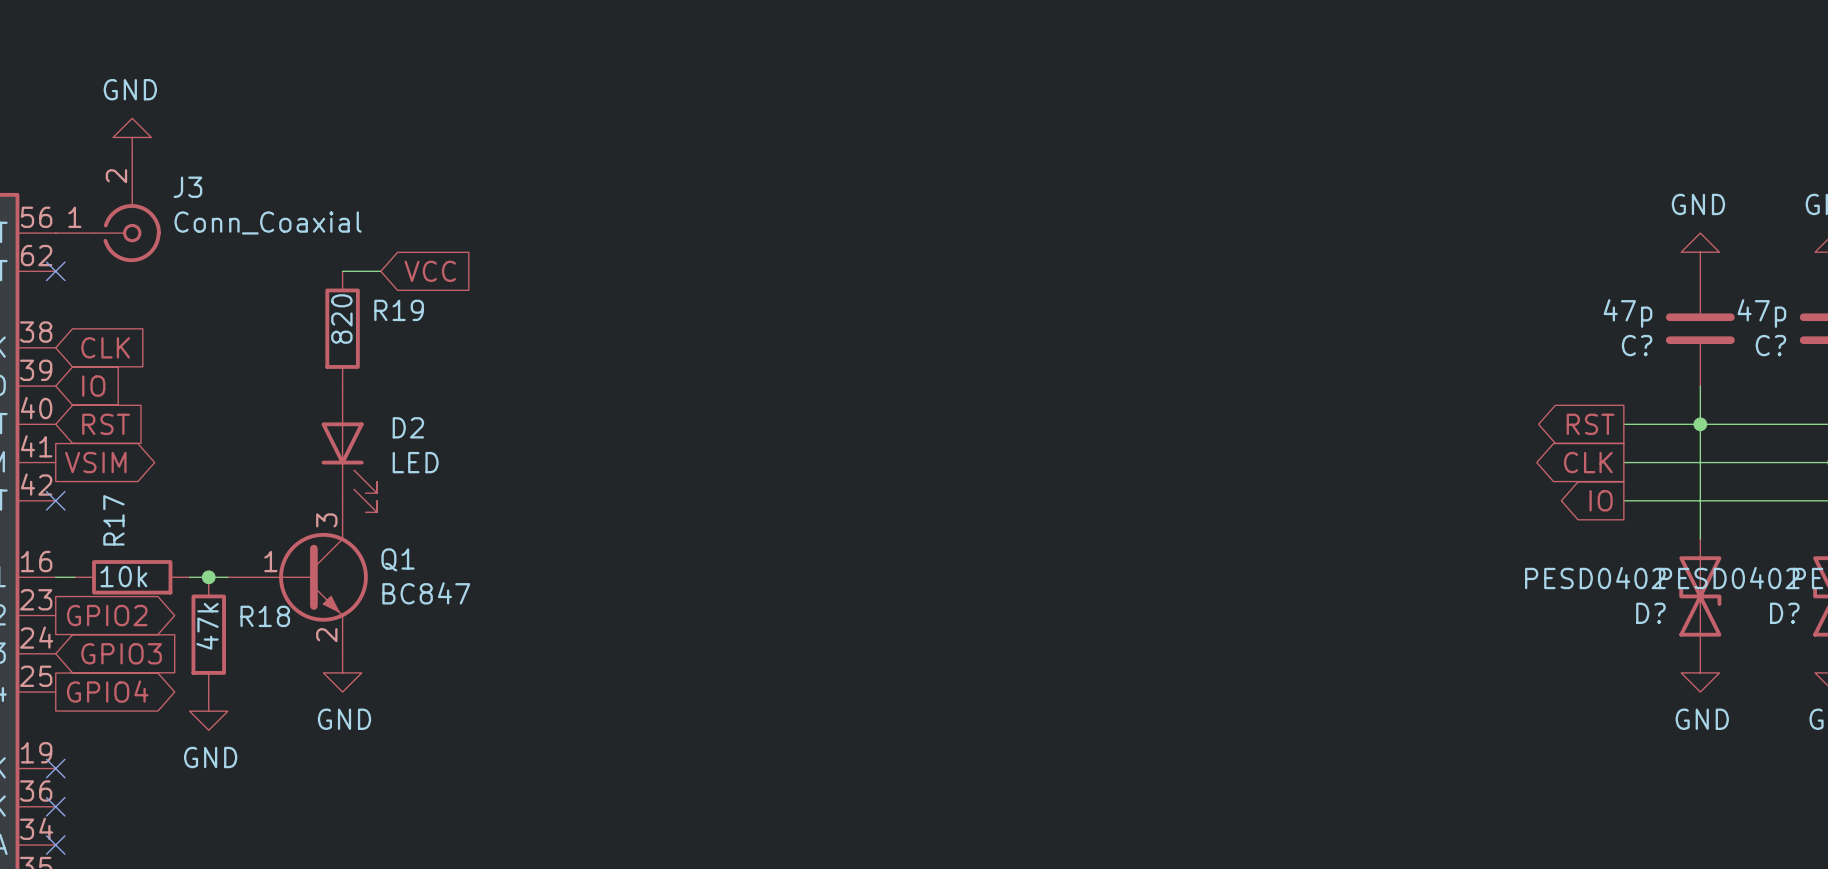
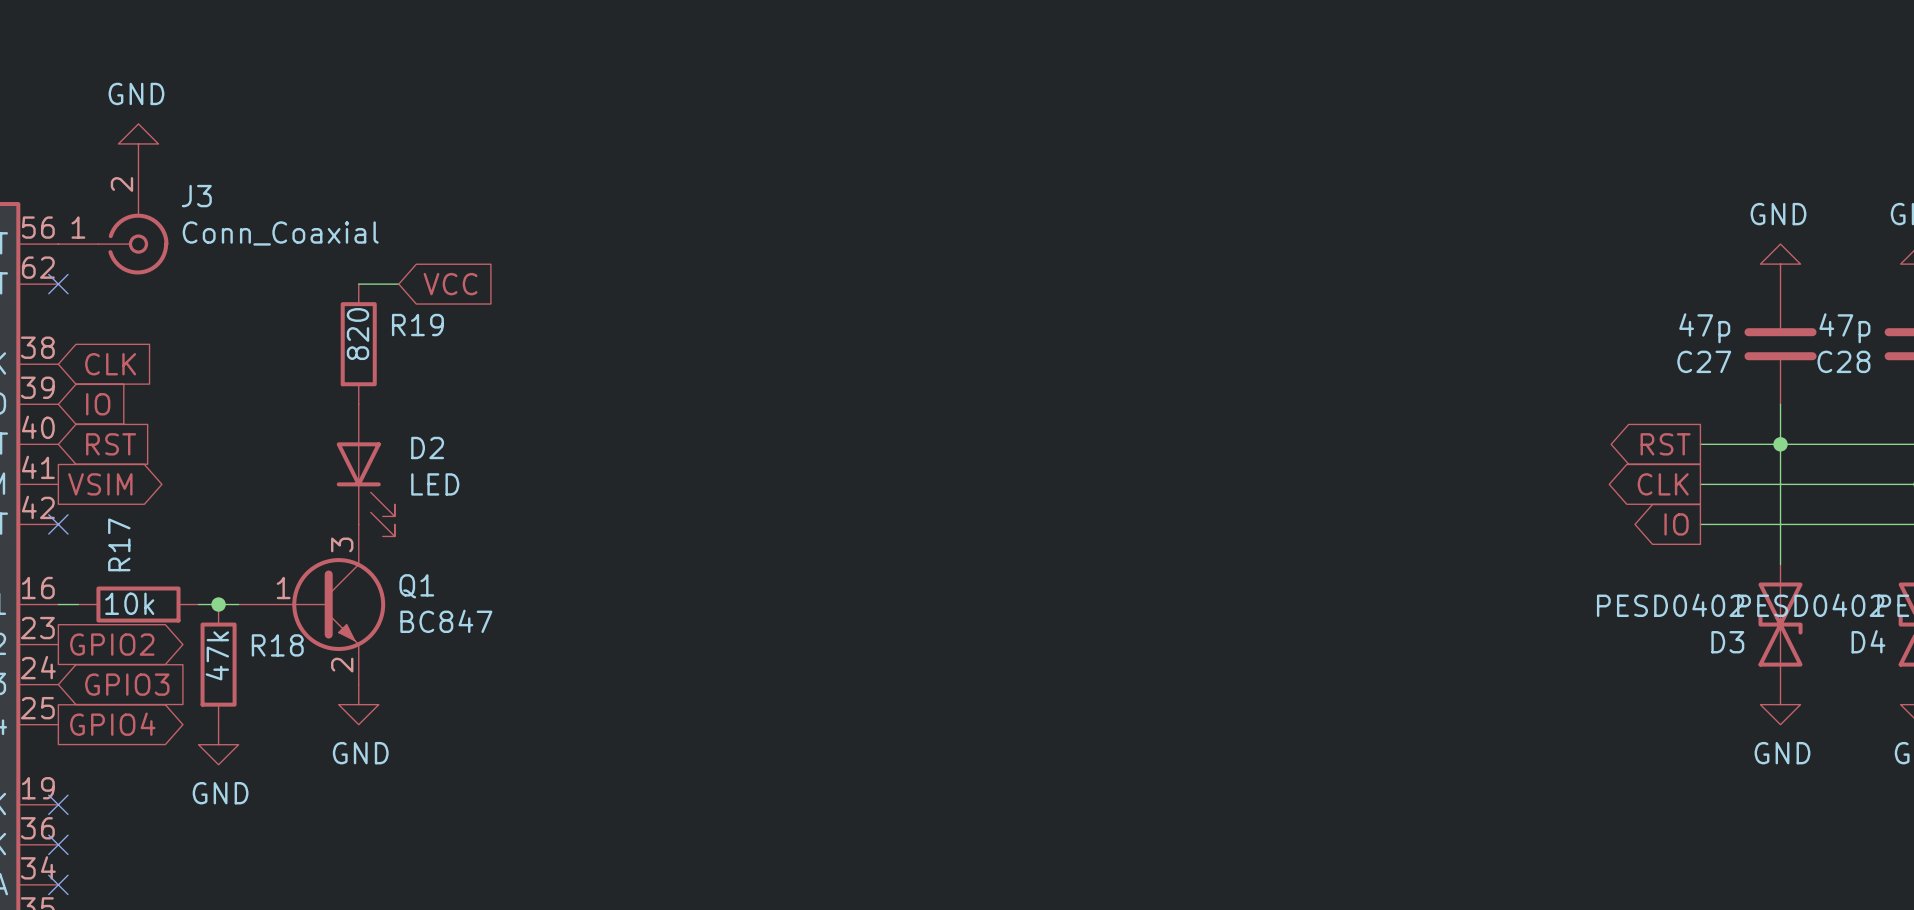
C? name: C? (1637, 345) -> C27 (1704, 361)
C? name: C? (1770, 345) -> C28 (1843, 361)
D? name: D? (1650, 613) -> D3 (1727, 642)
D? name: D? (1784, 613) -> D4 (1868, 641)

